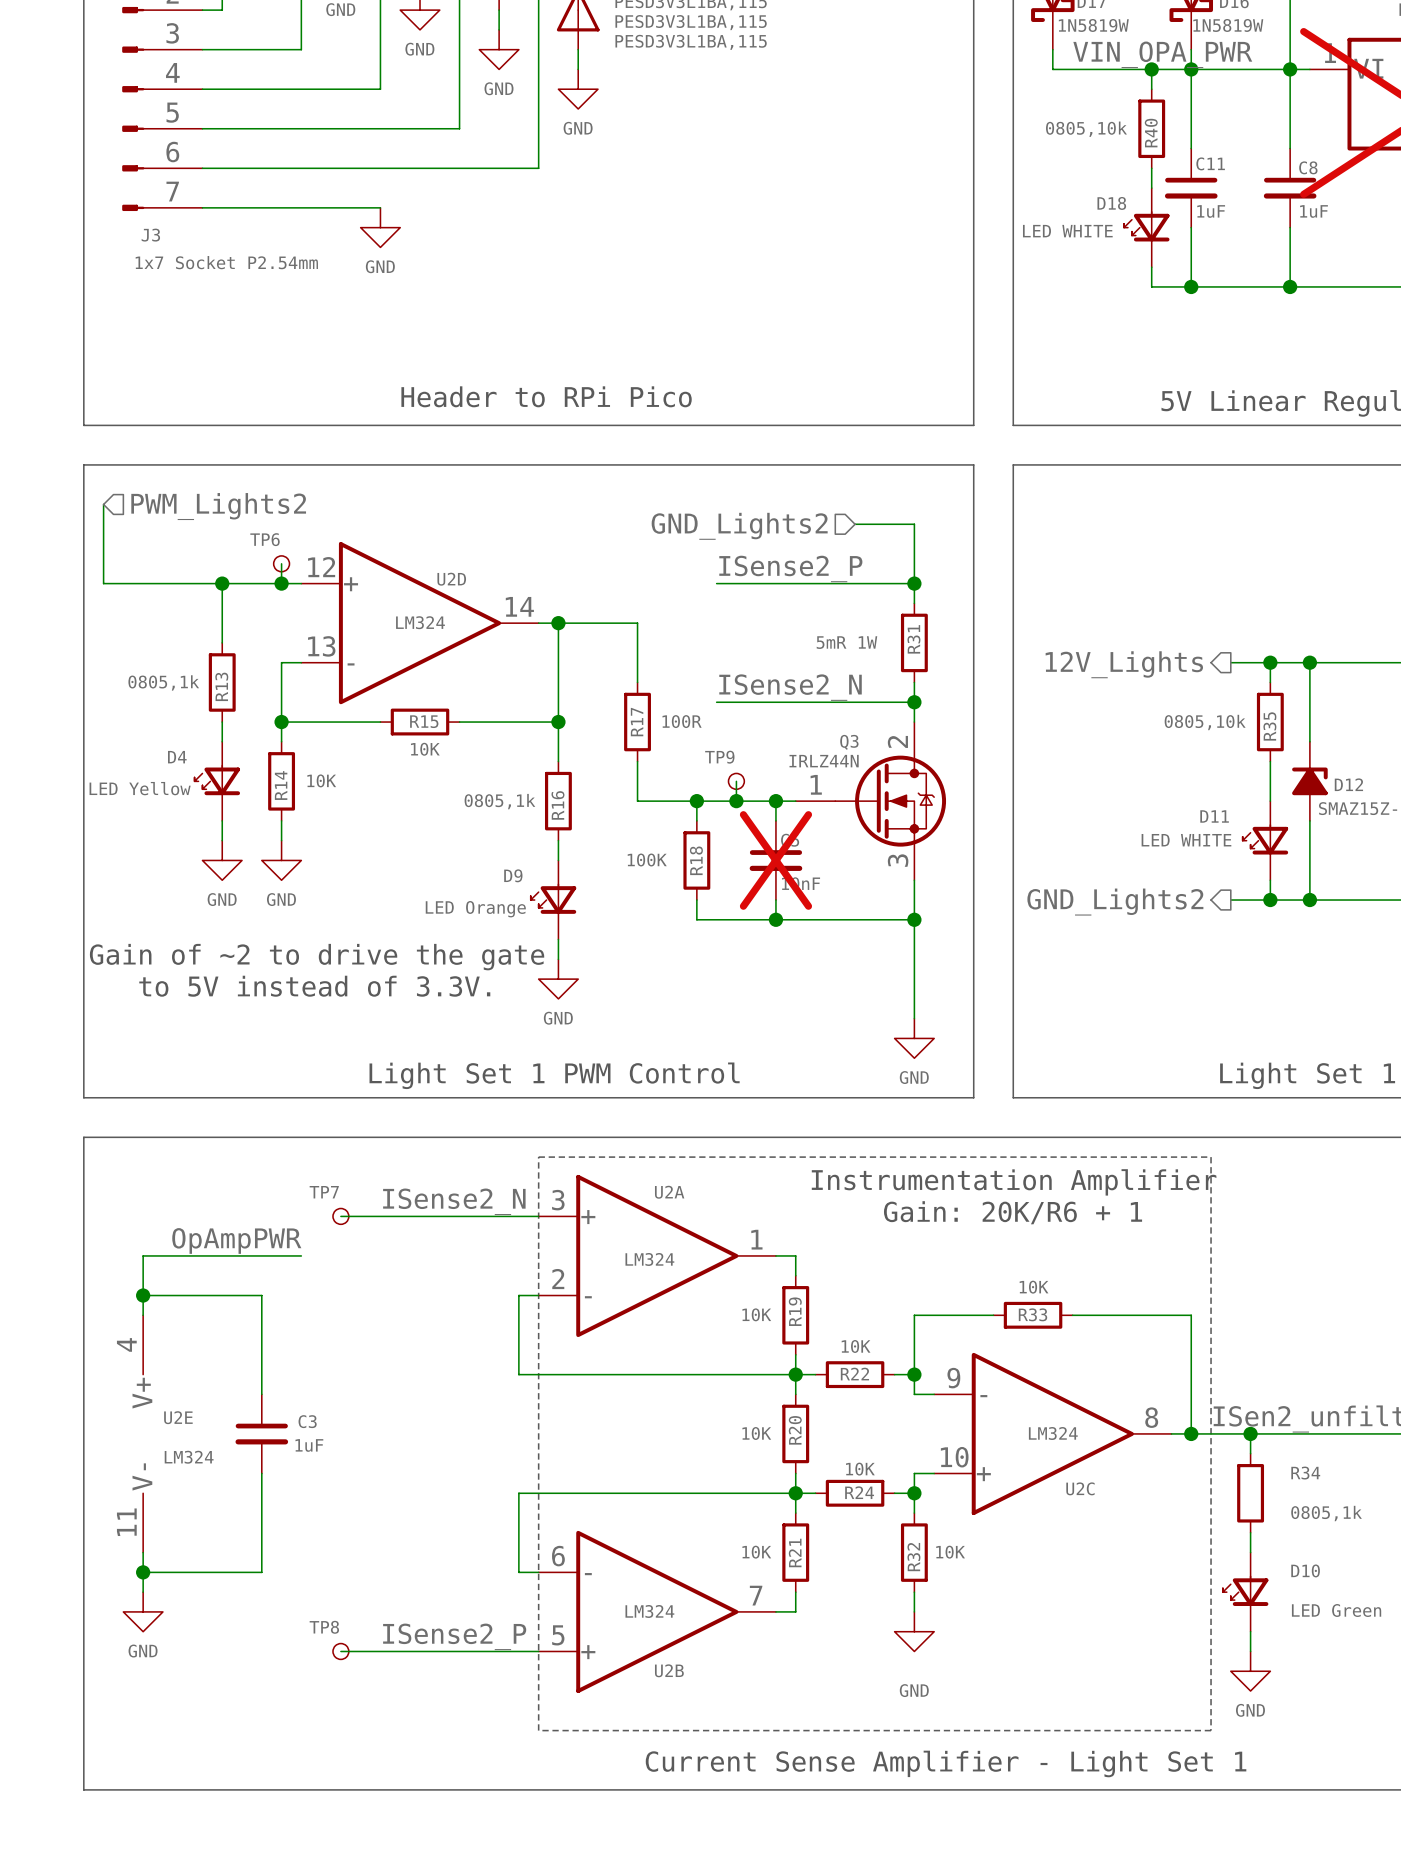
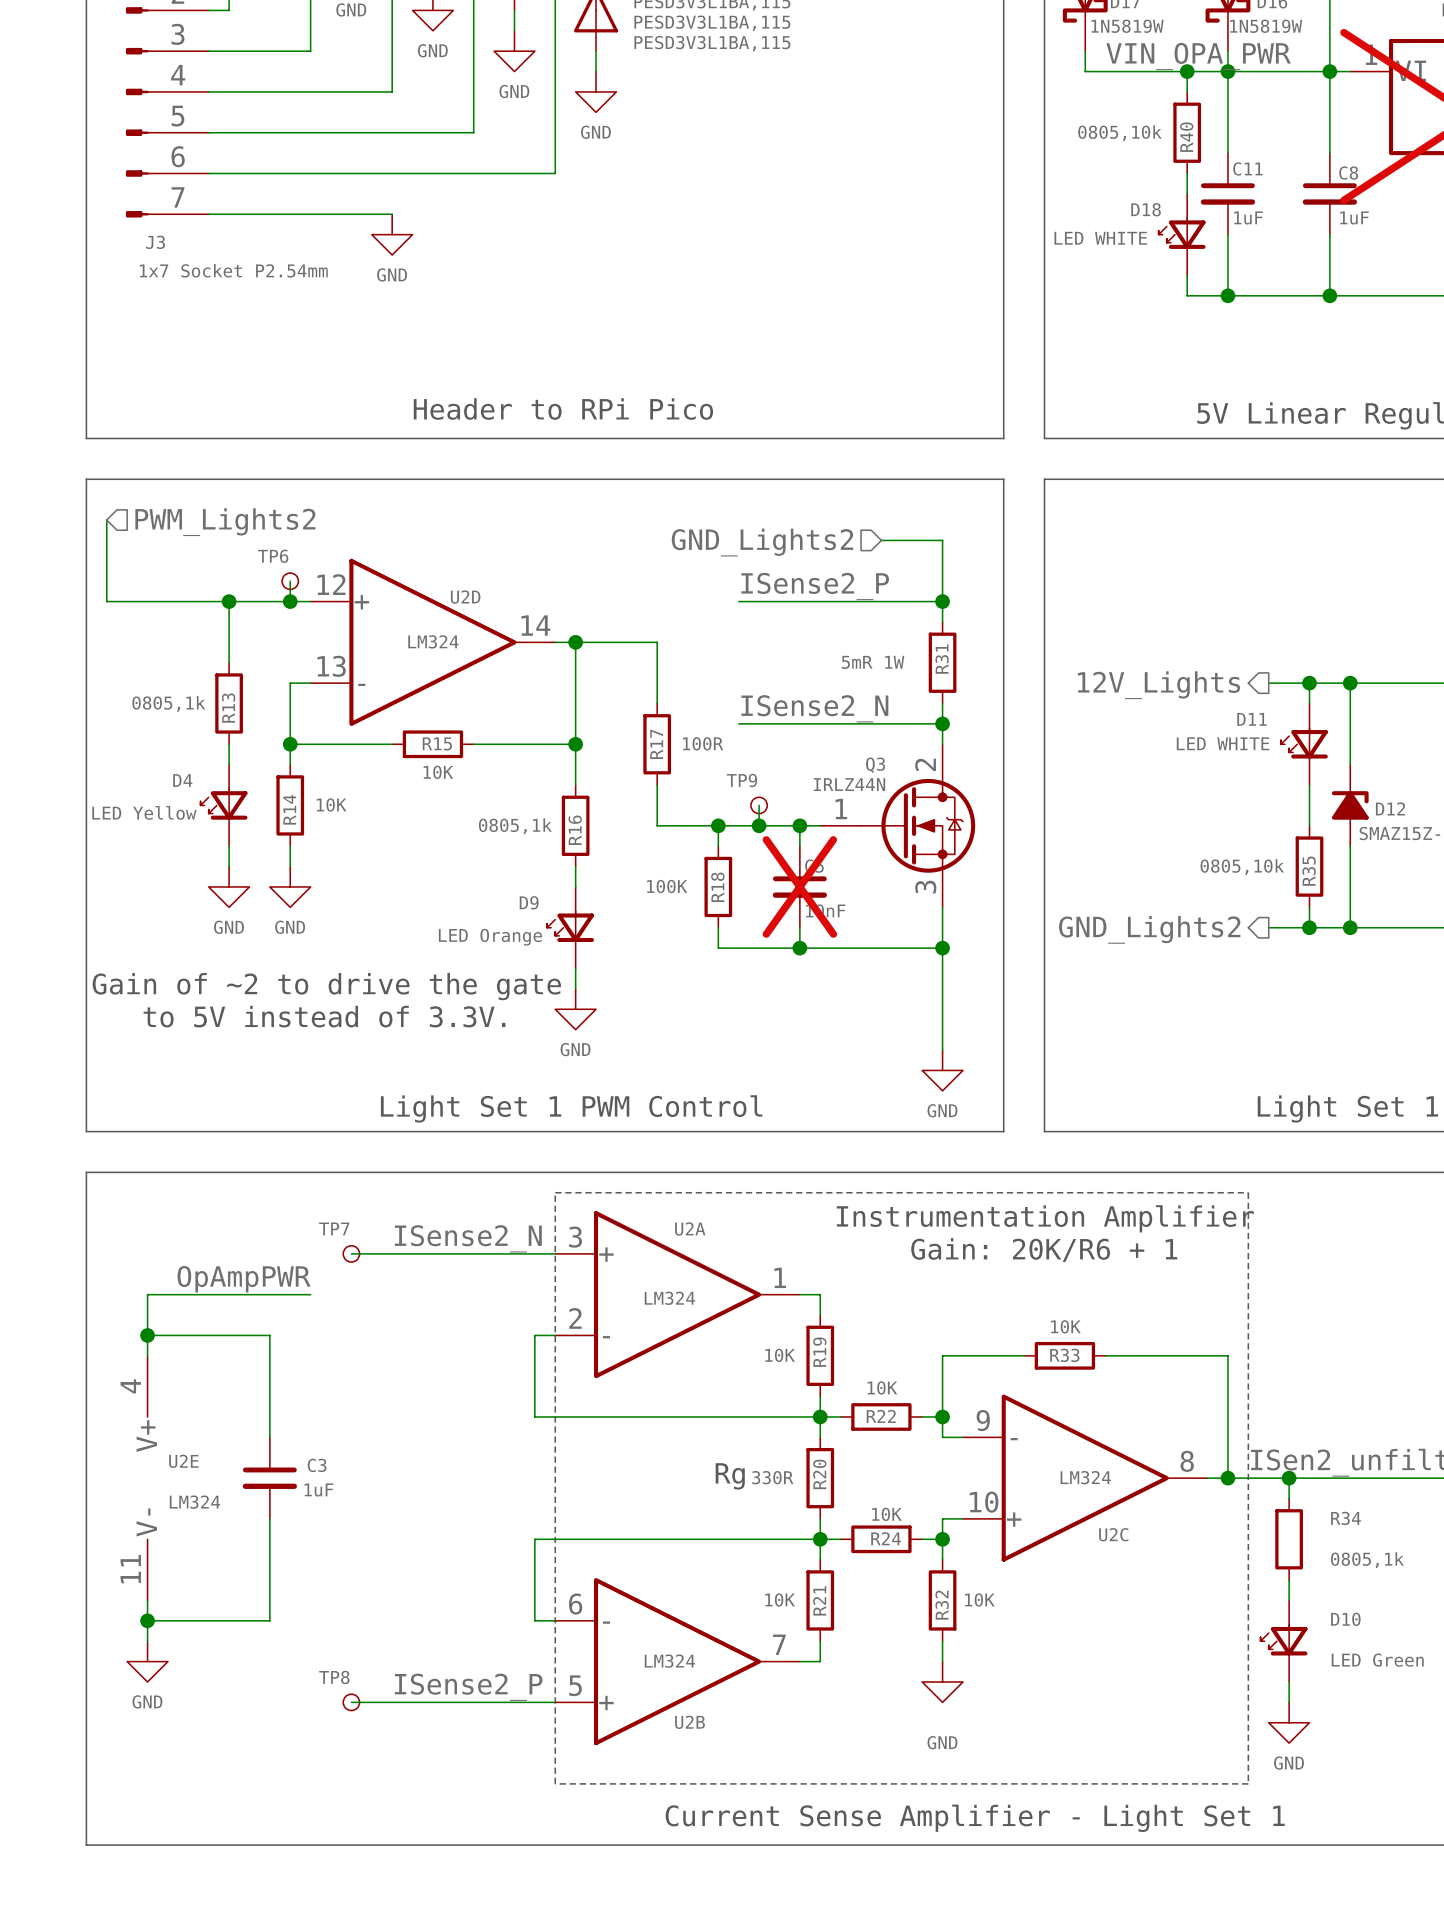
R35 position: (1270, 722) -> (1309, 866)
D11 position: (1265, 840) -> (1304, 744)
text: none -> Rg (730, 1476)
R20 value: 10K (756, 1433) -> 330R (772, 1477)

